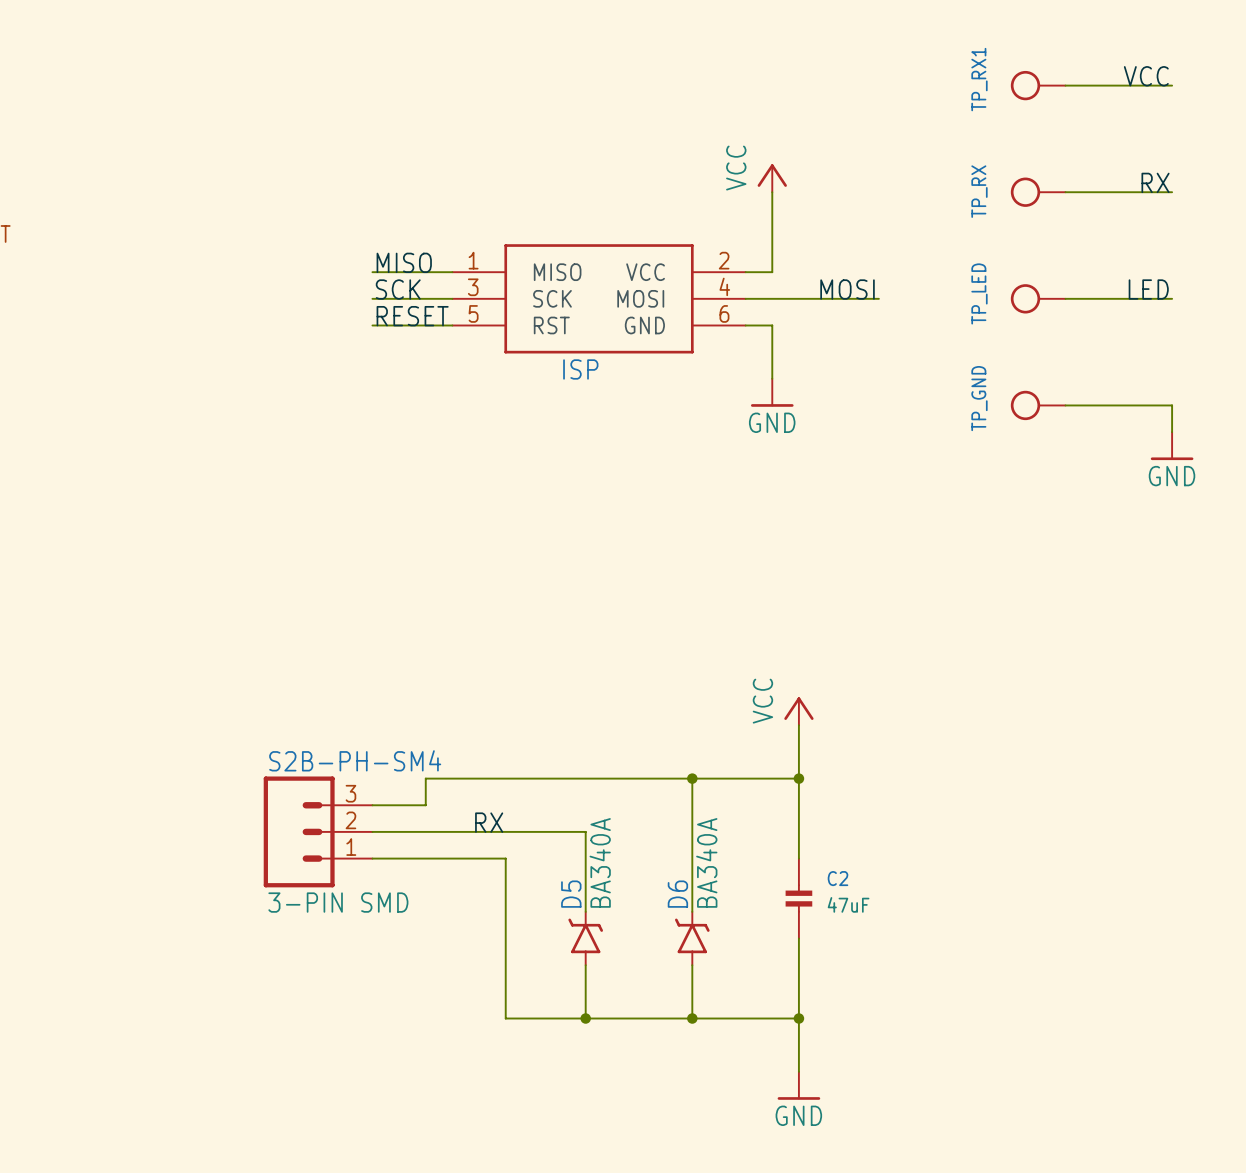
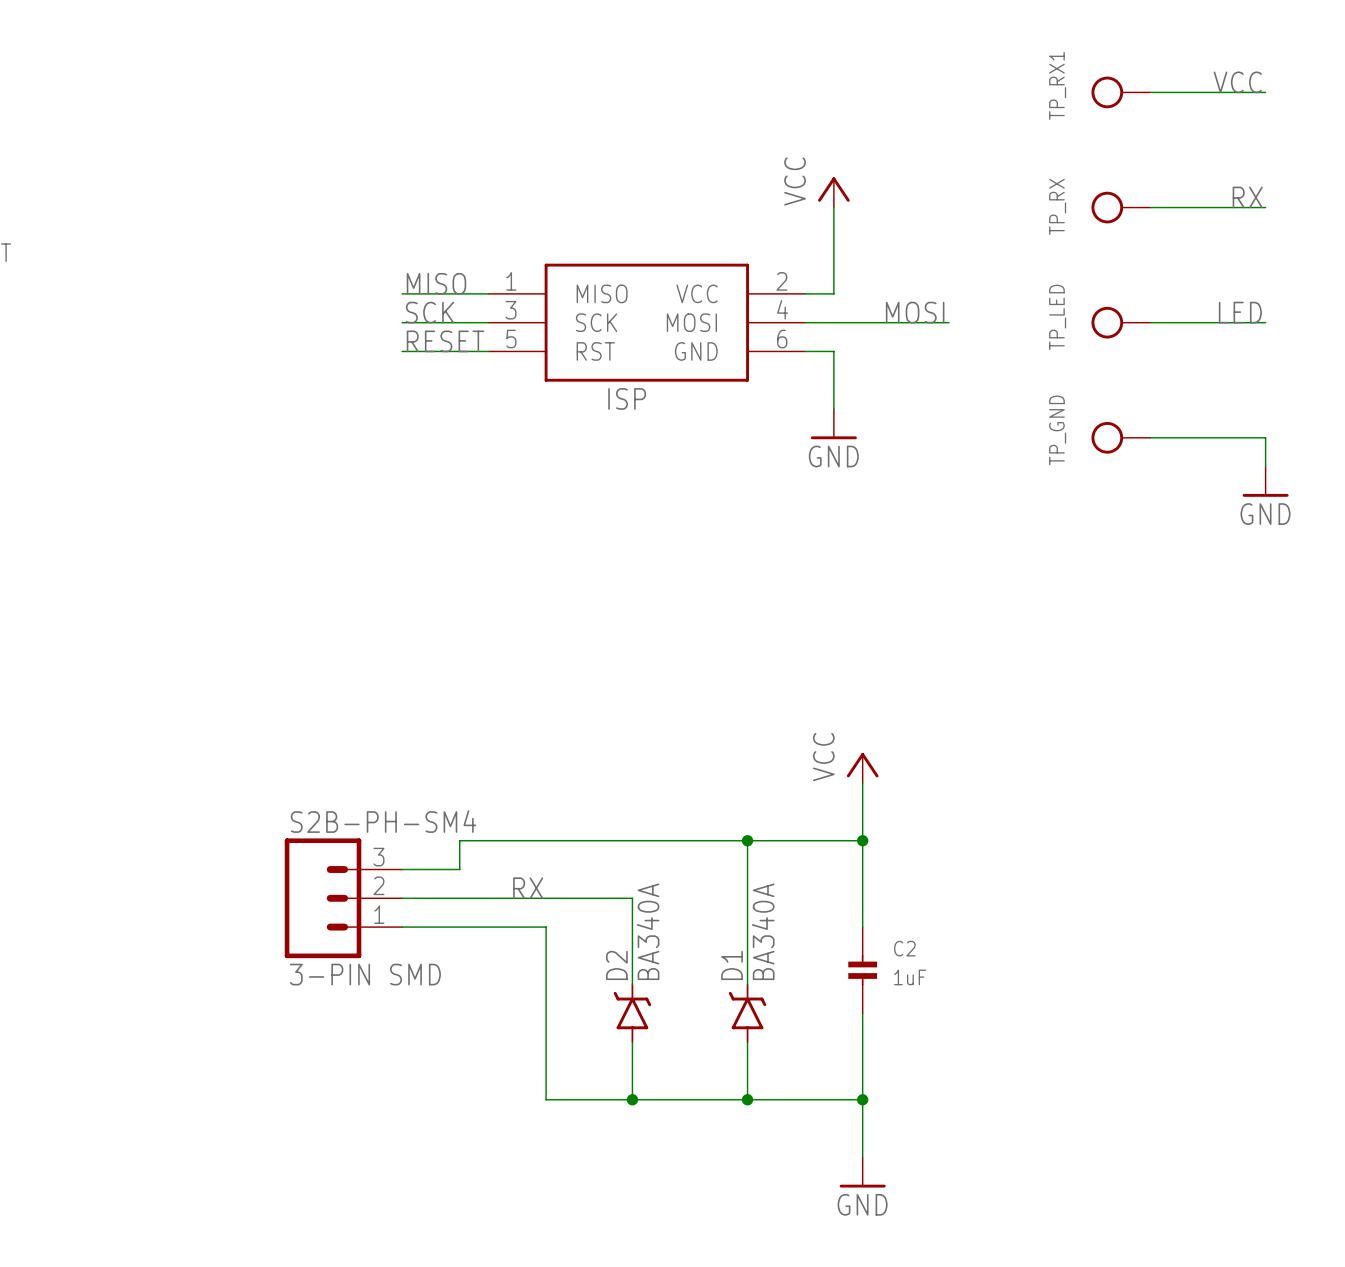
D5 name: D5 (571, 894) -> D2 (616, 965)
D6 name: D6 (677, 894) -> D1 (732, 965)
C2 value: 47uF (848, 904) -> 1uF (910, 977)

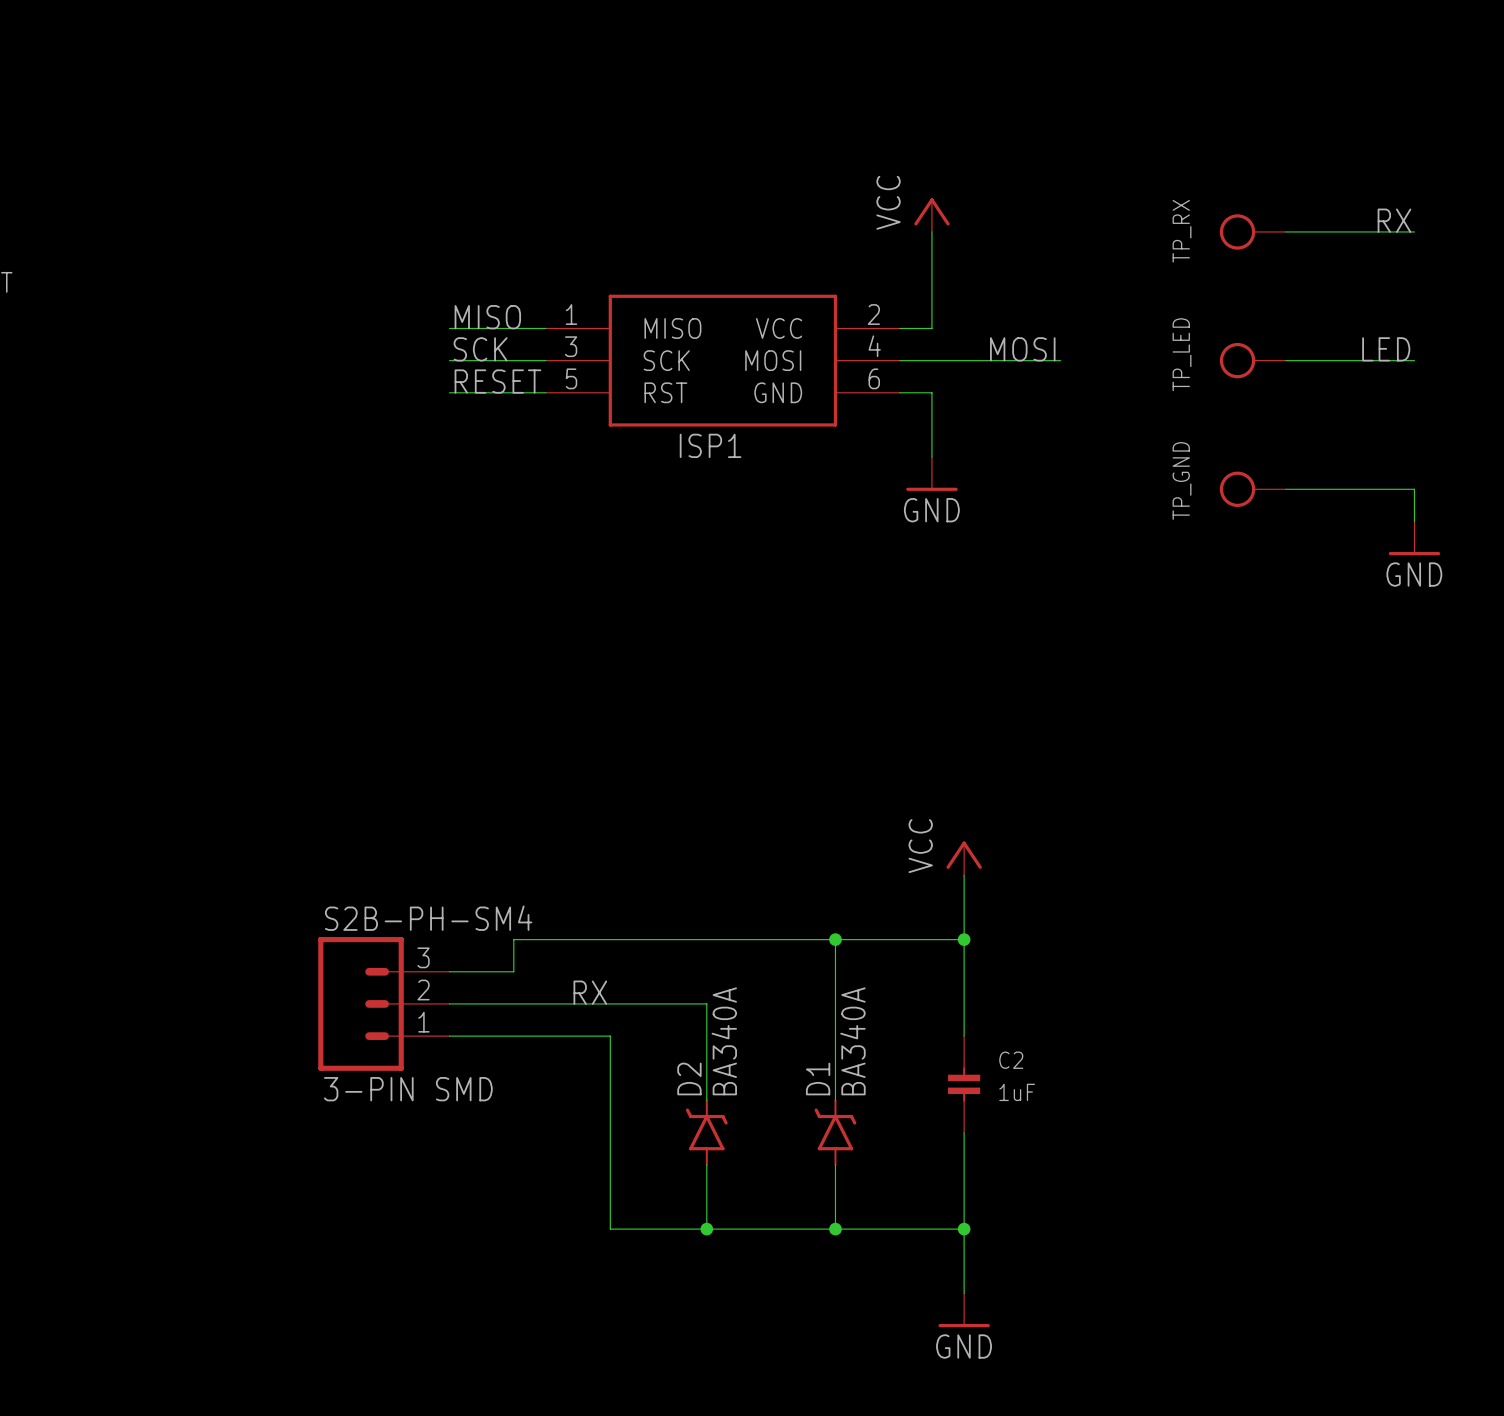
label: VCC (1237, 82) -> none
TP_RX1: (1120, 92) -> none
wire: (1150, 92) (1265, 92) -> none
ISP name: ISP (627, 398) -> ISP1 (710, 445)

